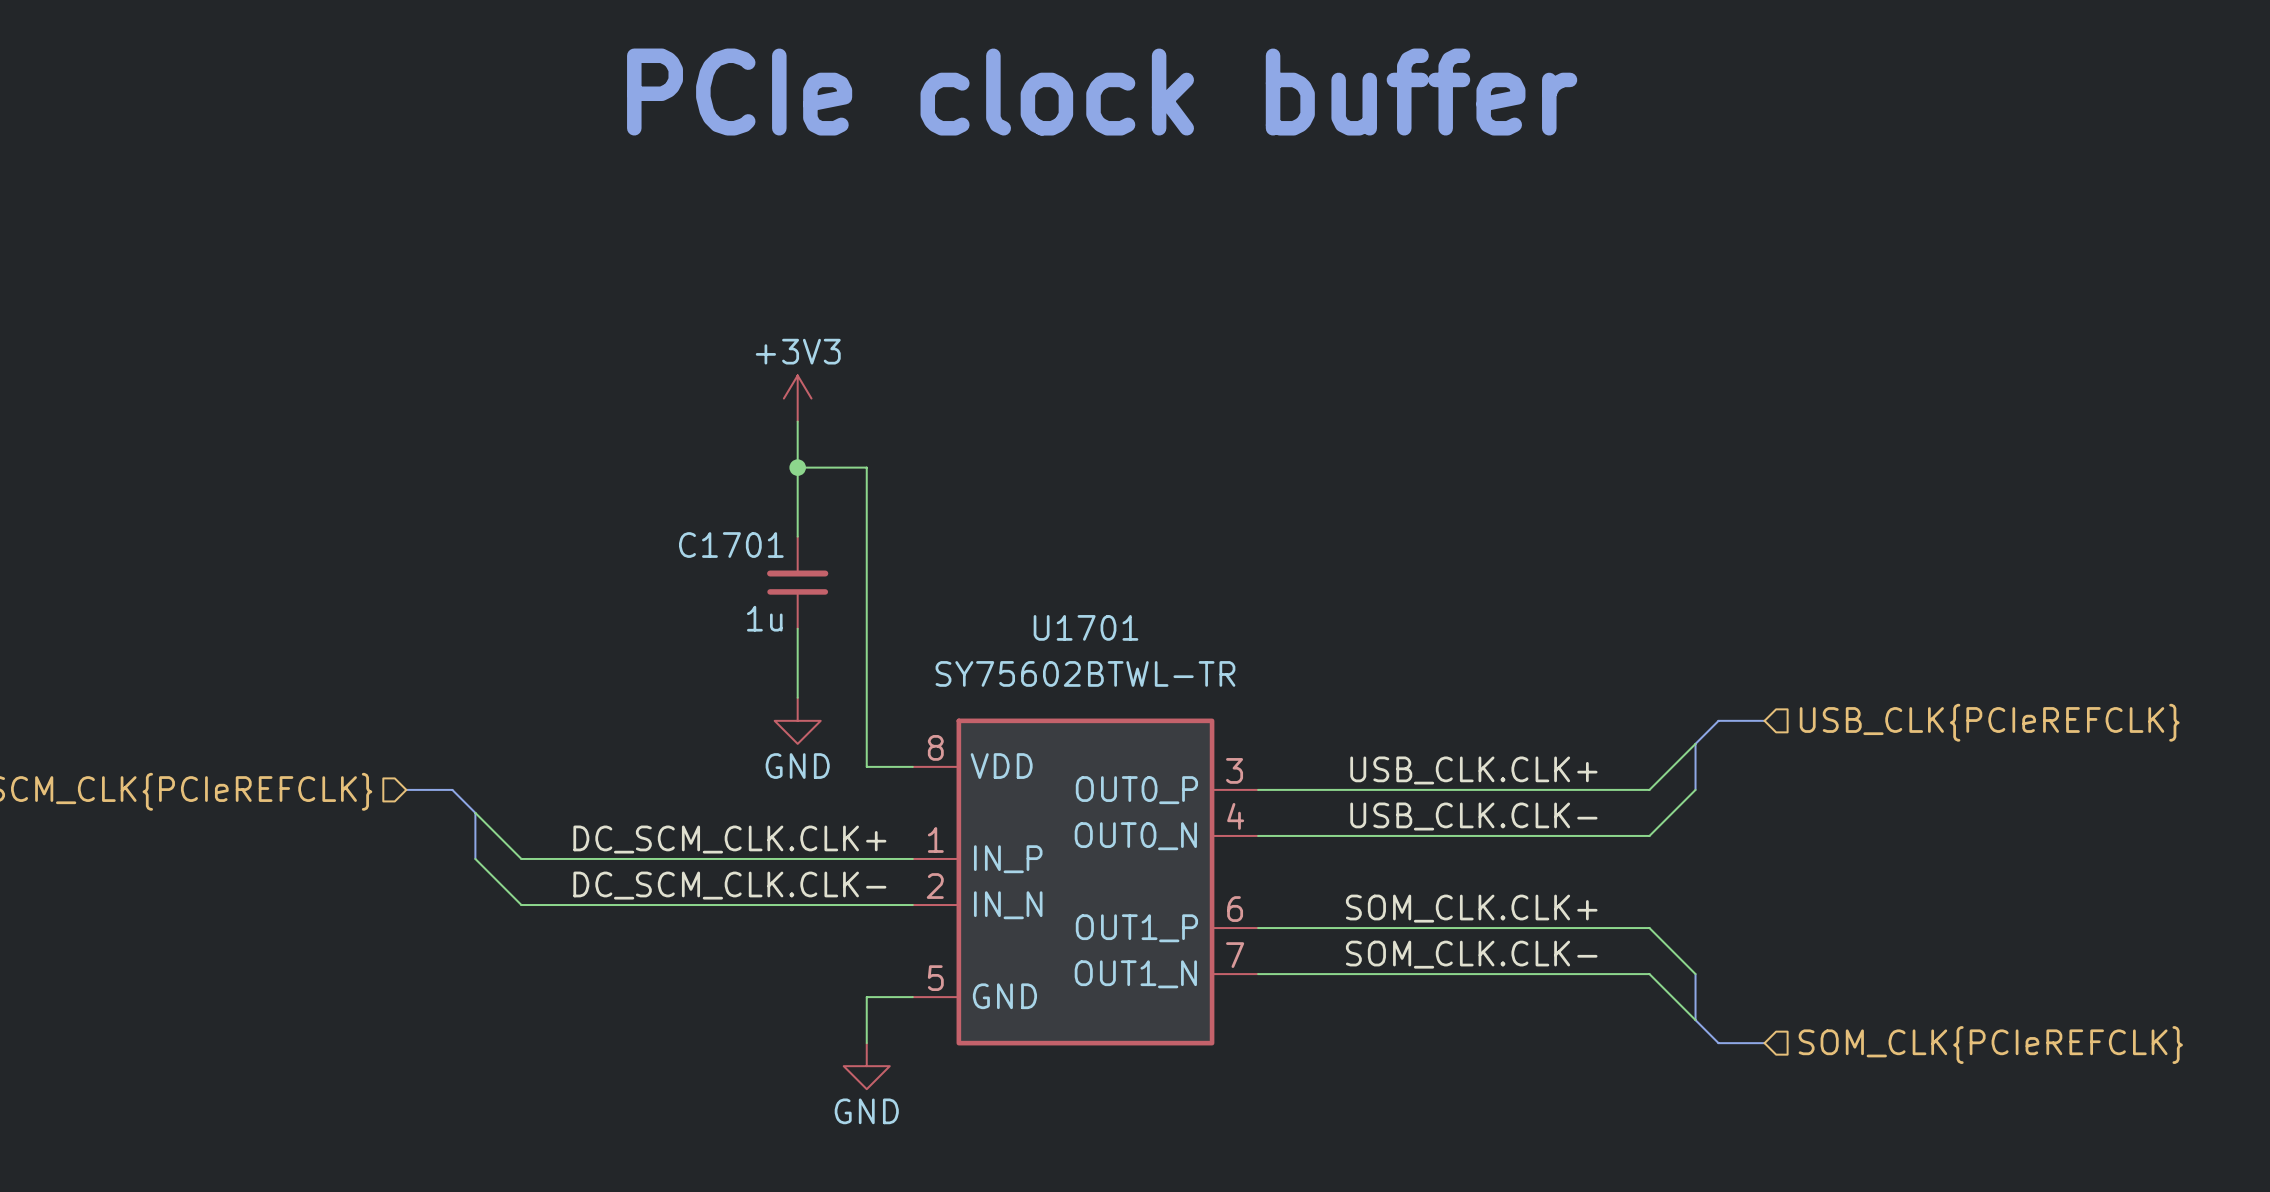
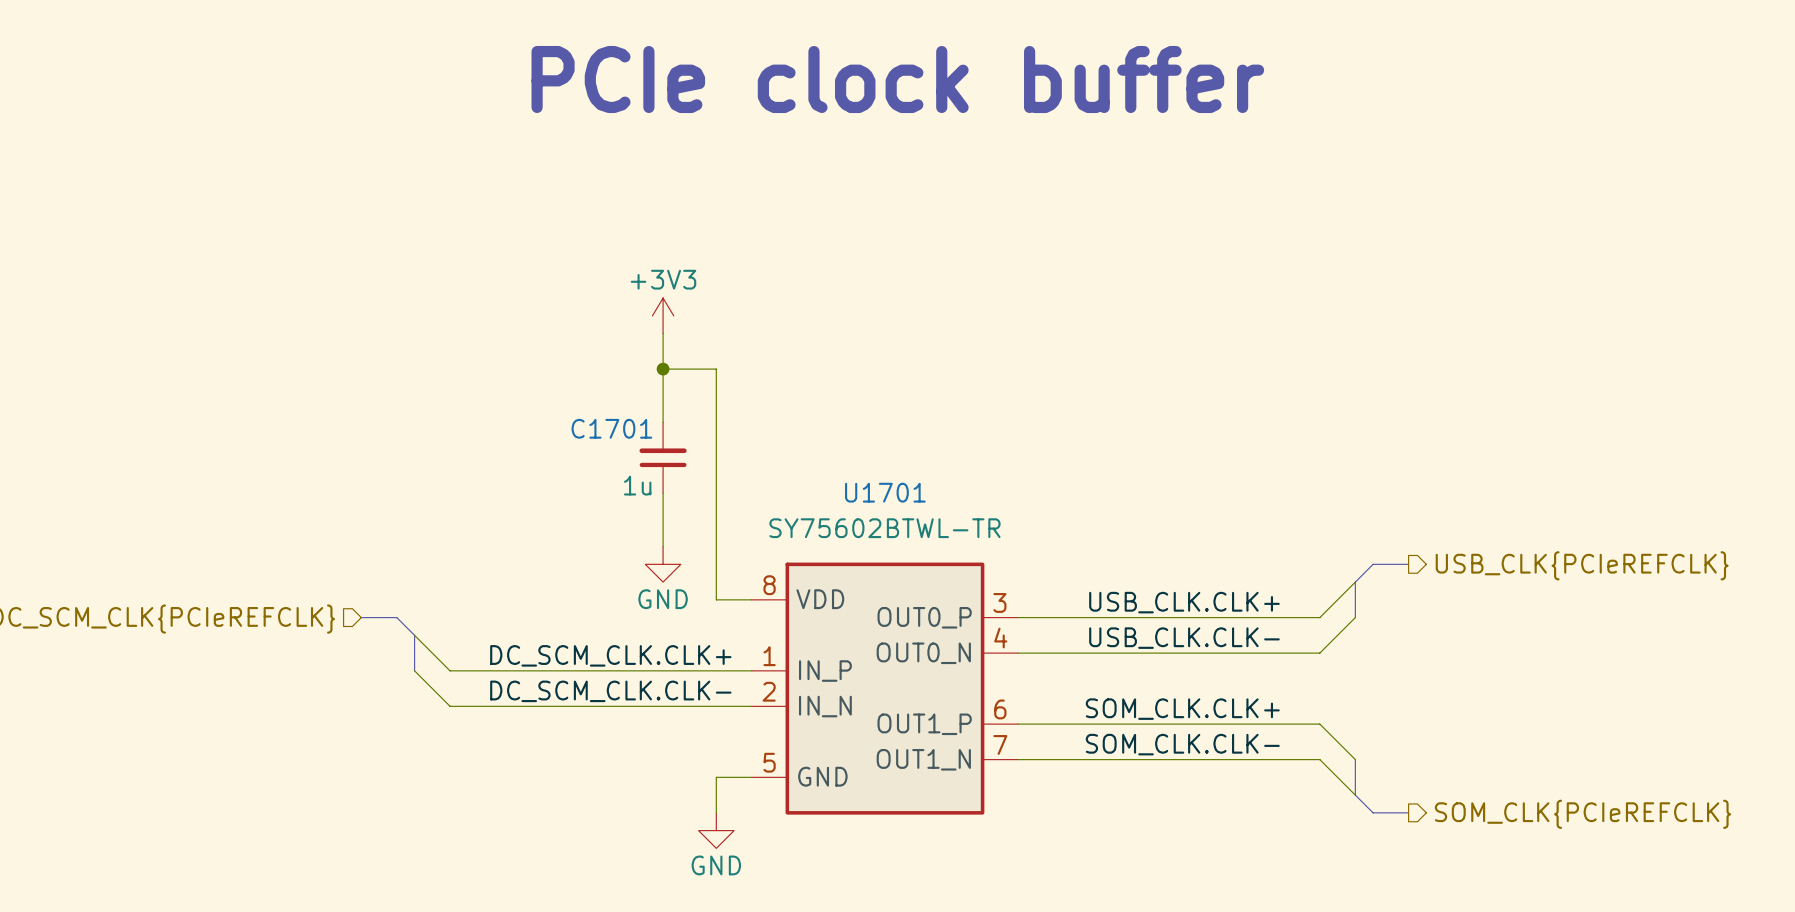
hierarchical label shape: input (1989, 722) -> output (1582, 565)
hierarchical label shape: input (1990, 1045) -> output (1583, 814)

